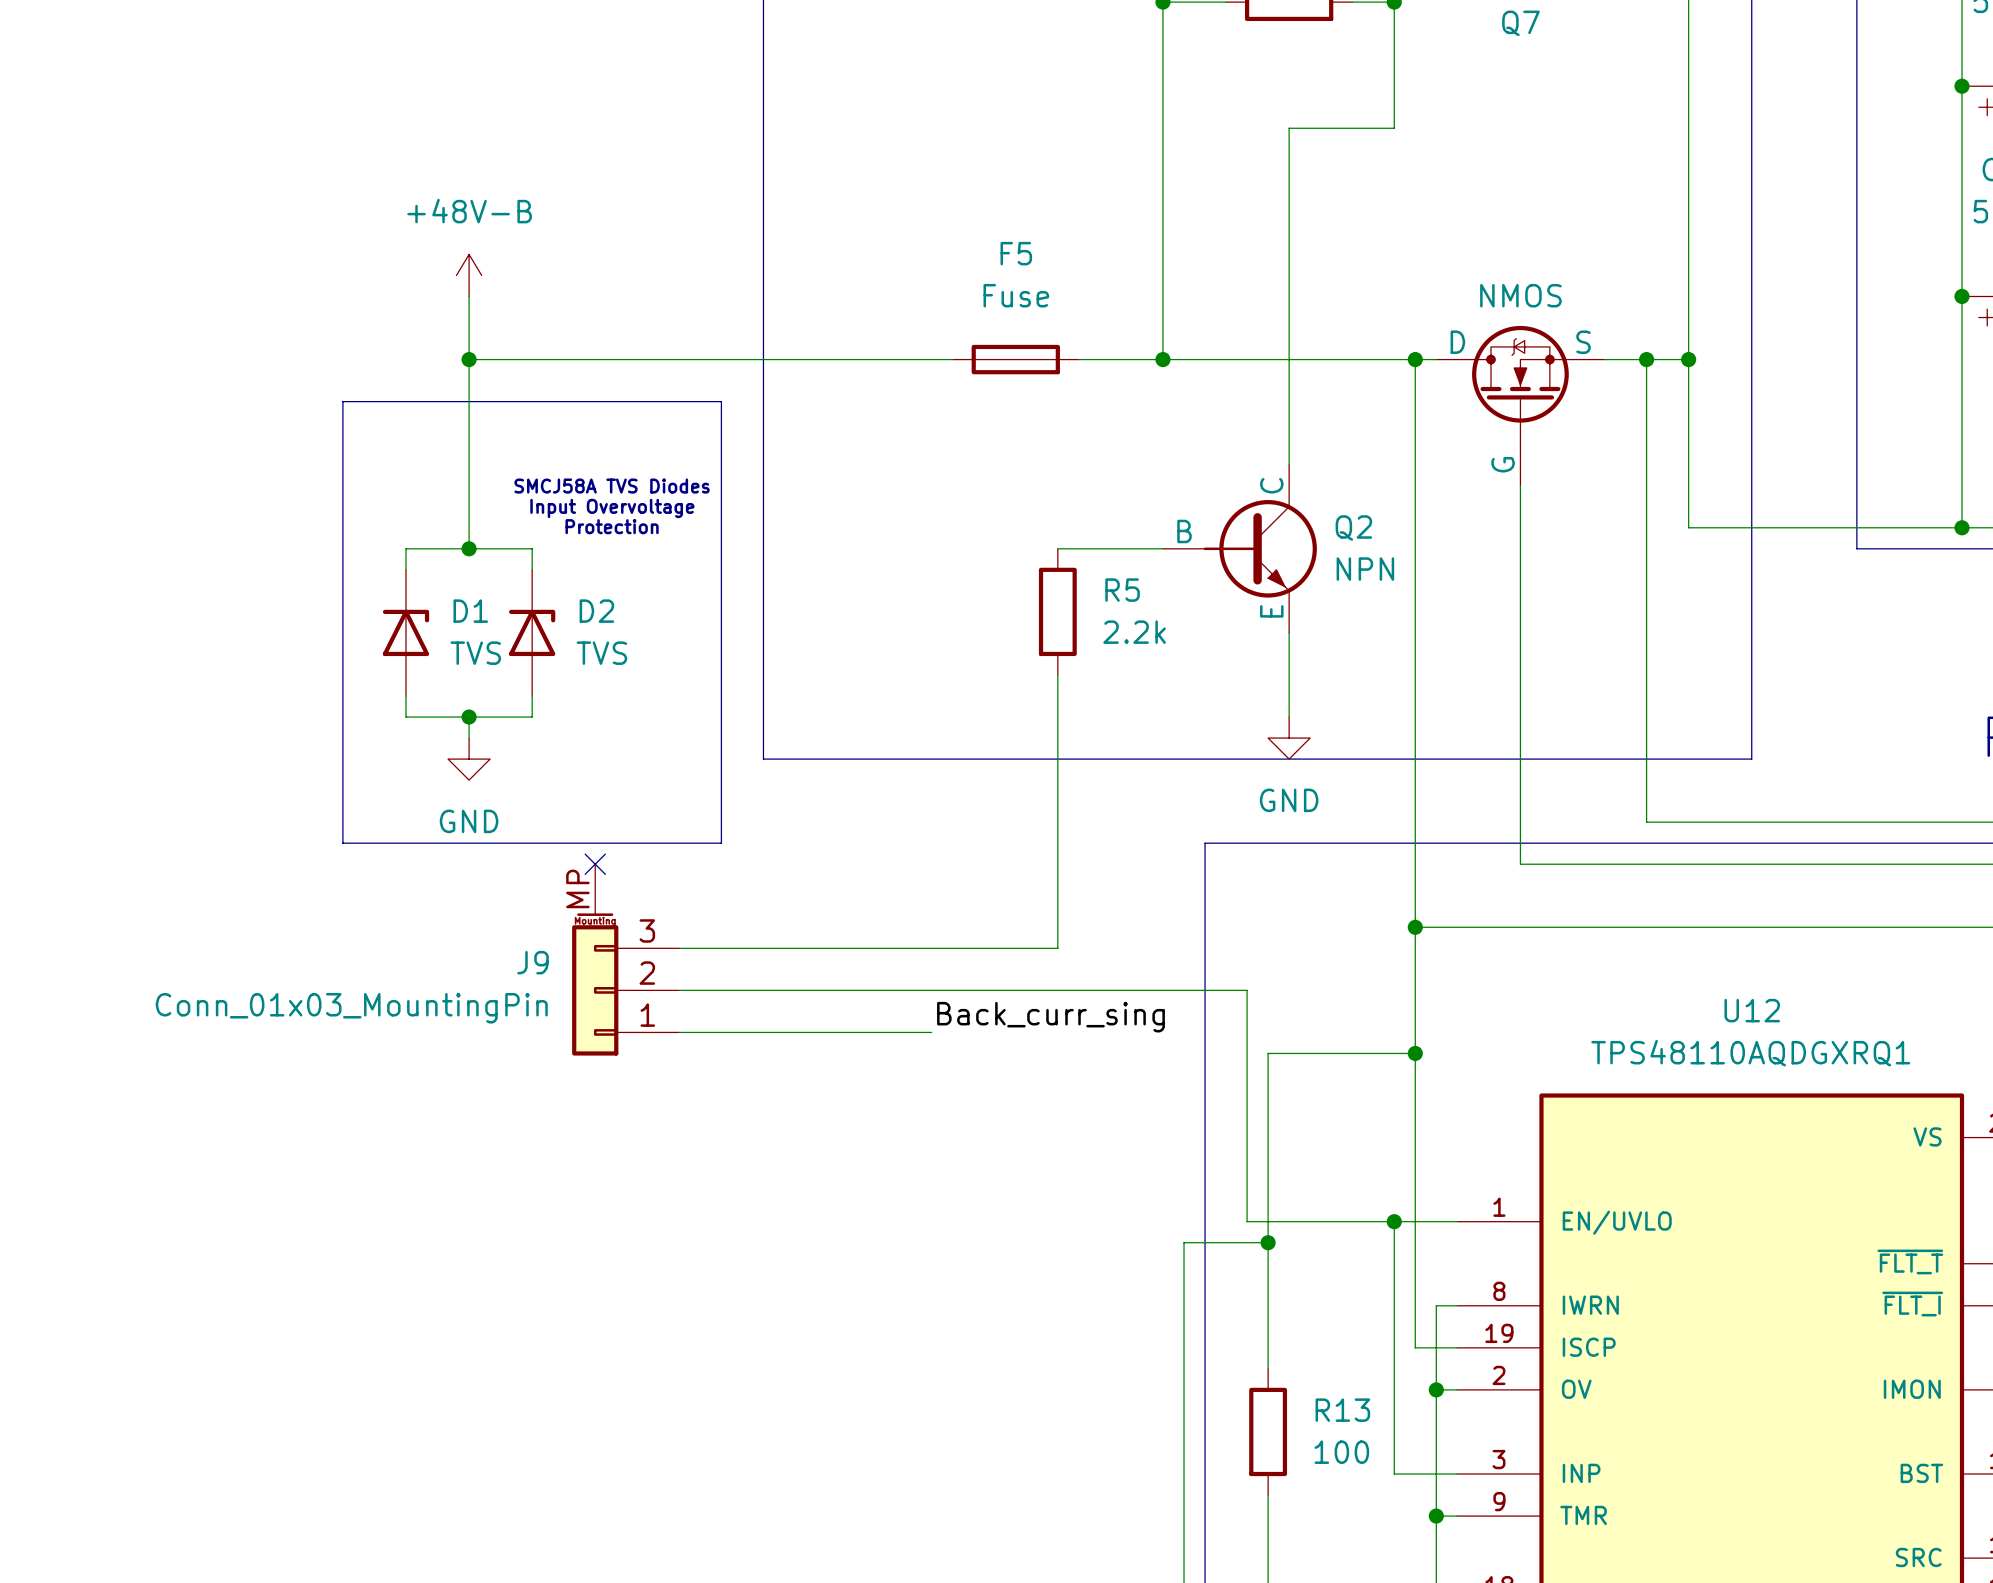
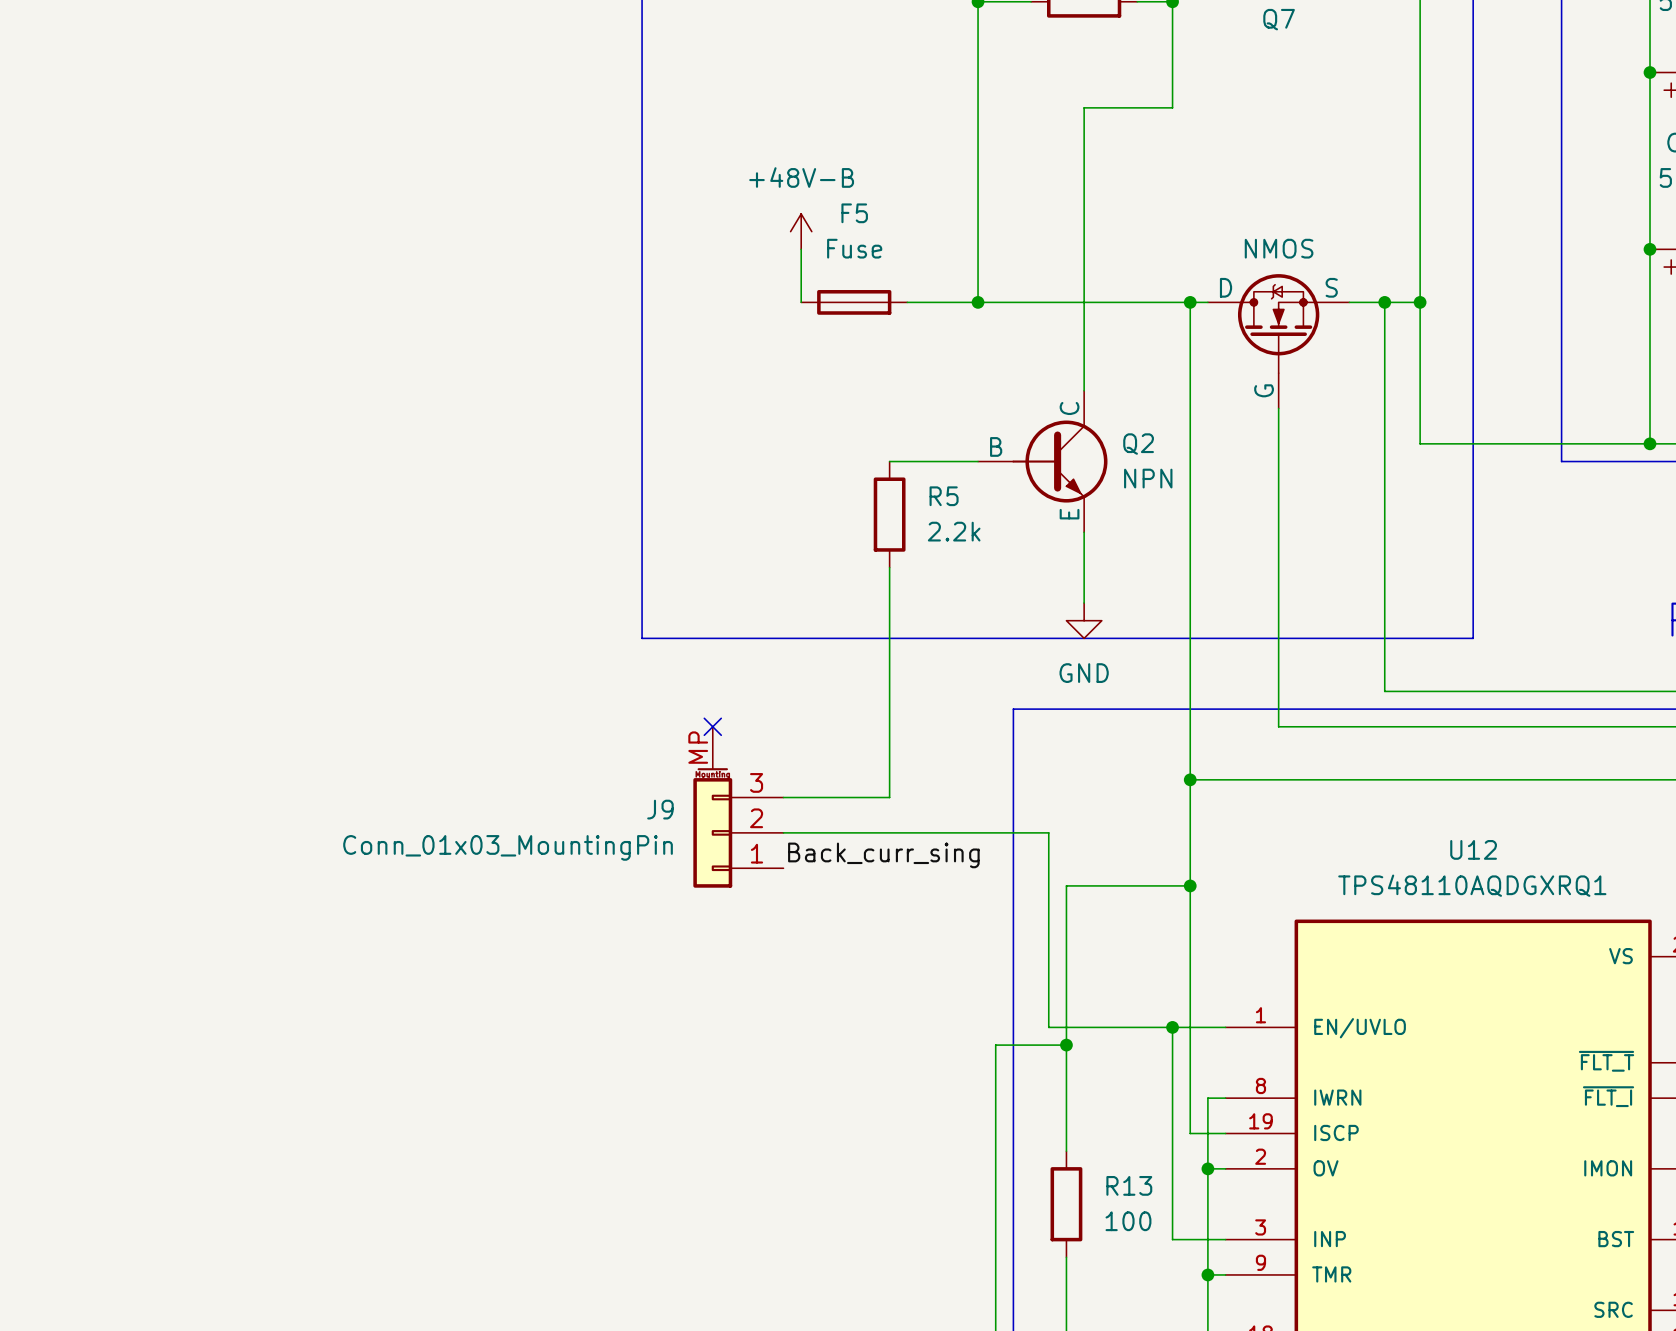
power symbol: +48V-B (469, 275) -> none
power symbol: none -> +48V-B (801, 231)
wire: (469, 296) (469, 548) -> none
wire: (469, 359) (952, 359) -> (801, 249) (801, 302)
junction: (469, 359) -> none
line: (342, 401) (721, 401) (721, 843) (342, 843) (342, 401) -> none
text: SMCJ58A TVS Diodes (612, 486) -> none
text: Input Overvoltage (612, 508) -> none
text: Protection (612, 526) -> none
junction: (469, 548) -> none
wire: (406, 569) (406, 548) (532, 548) (532, 569) -> none
D1: TVS (406, 632) -> none
D2: TVS (532, 632) -> none
wire: (406, 696) (406, 717) (532, 717) (532, 696) -> none
wire: (469, 717) (469, 738) -> none
junction: (469, 717) -> none
power symbol: GND (469, 759) -> none
no-connect mark: (595, 864) -> none
no-connect mark: none -> (712, 726)
wire: (679, 948) (931, 948) -> none
J9 position: (625, 959) -> (738, 807)
wire: (679, 990) (931, 990) -> none
wire: (679, 1032) (931, 1032) -> none

